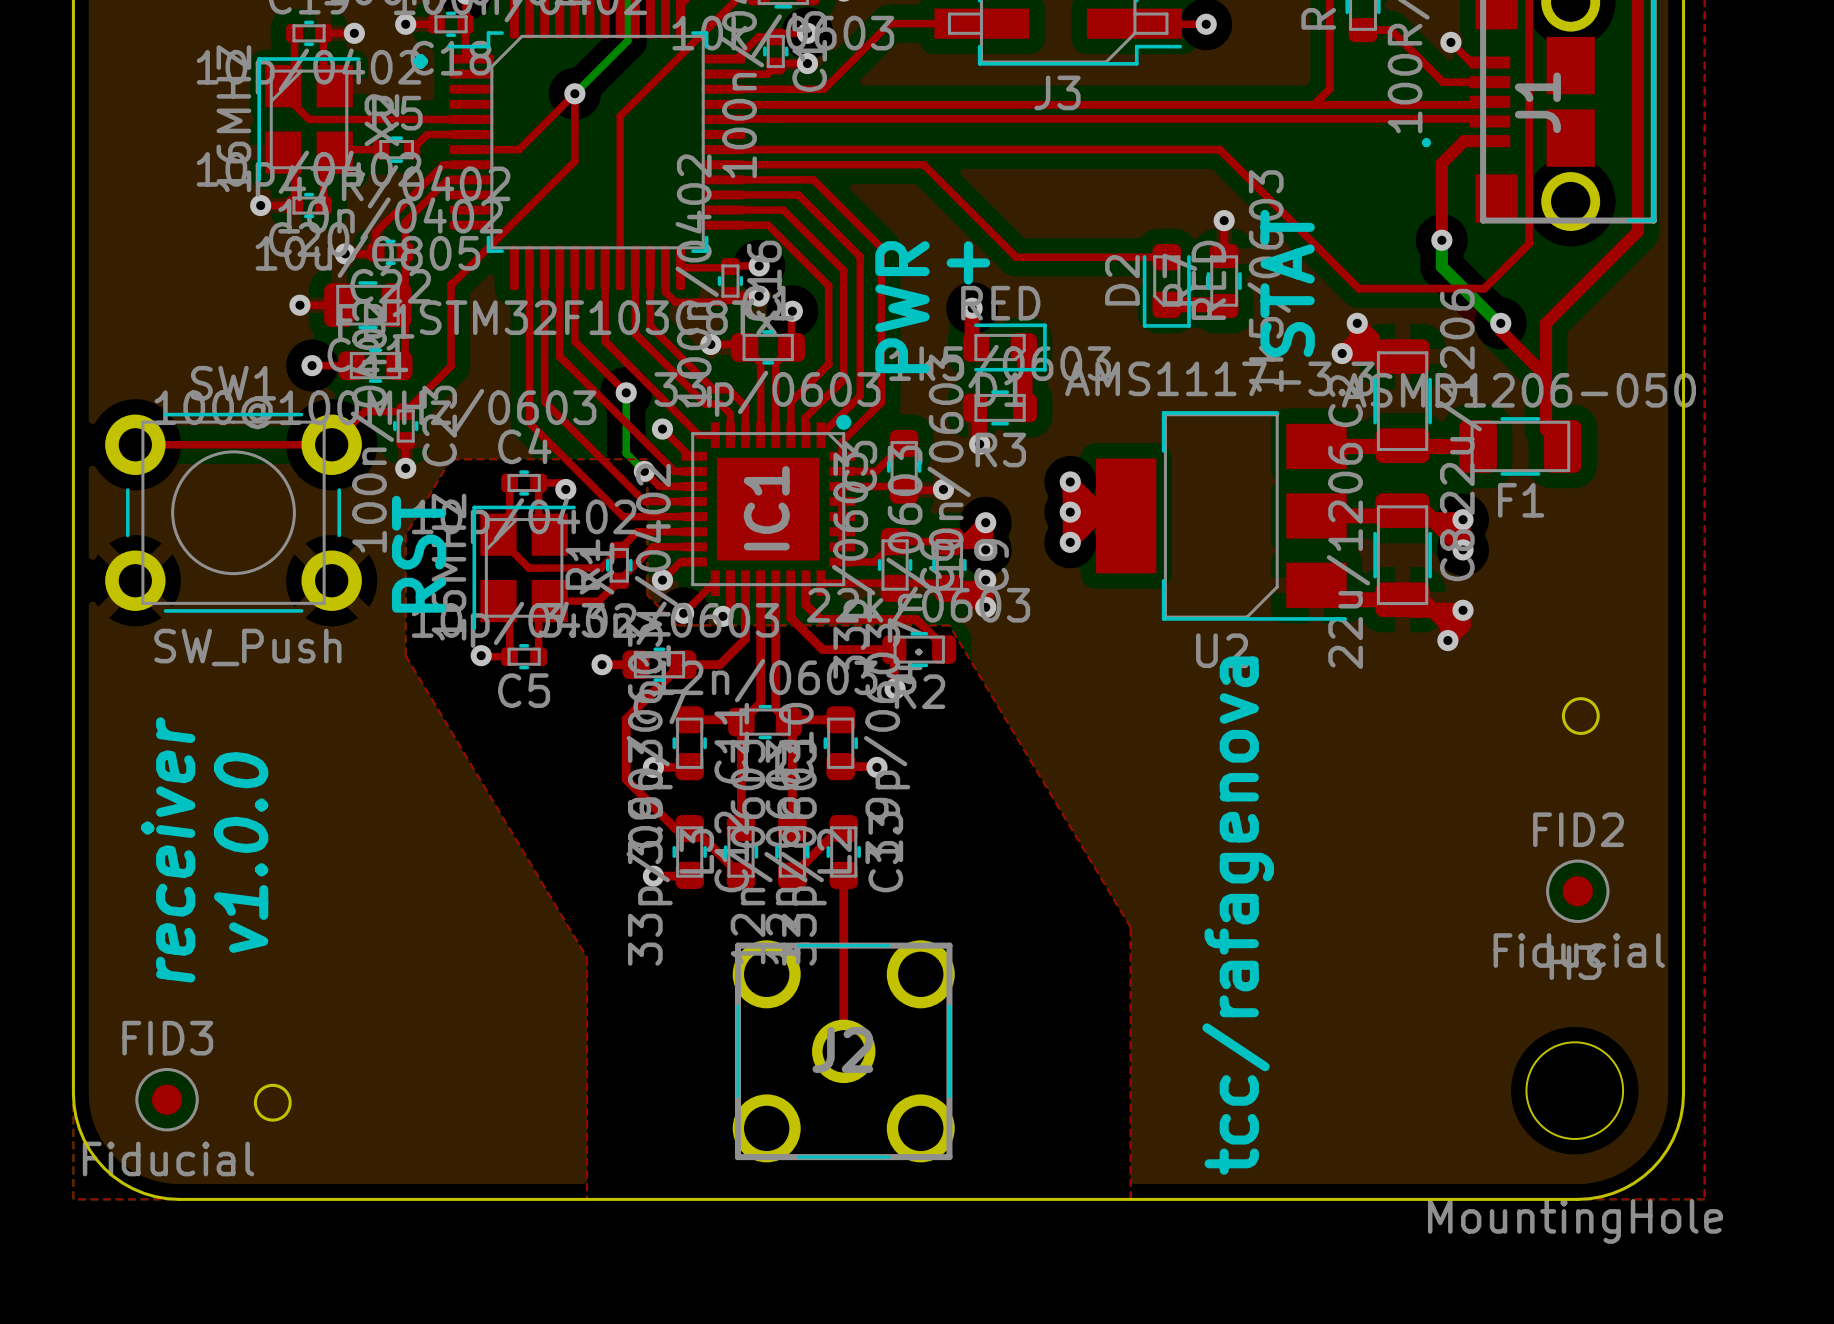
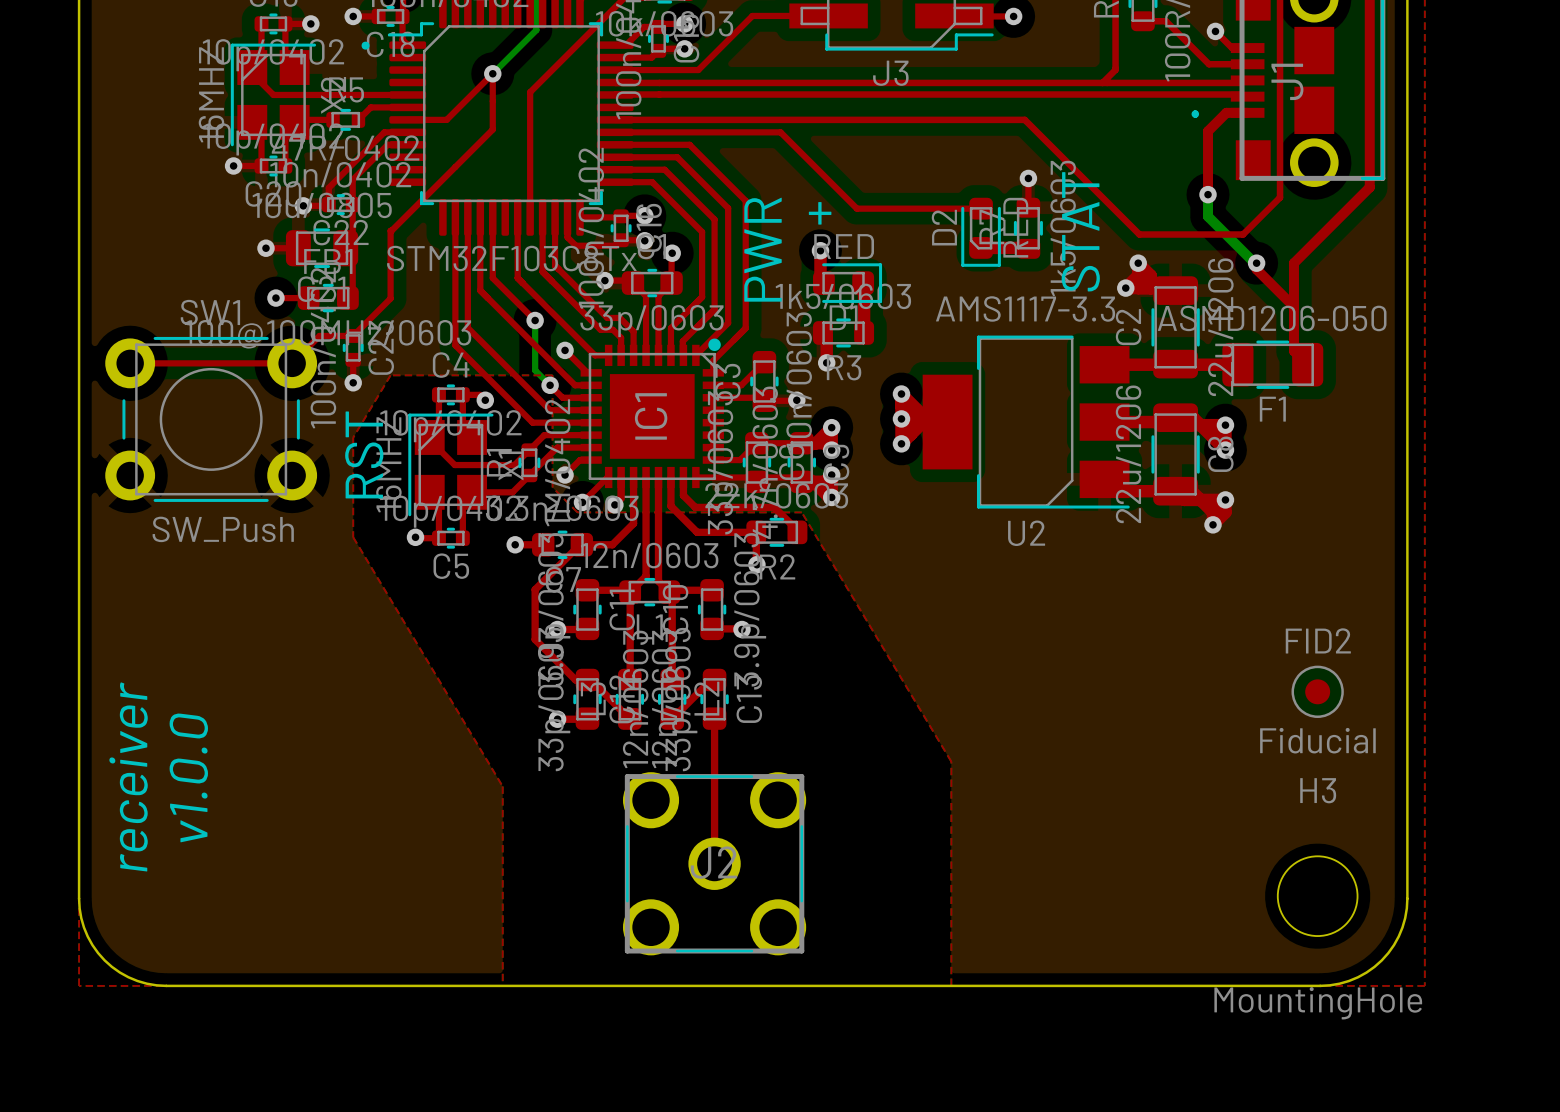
round board edge: [1561, 697, 1600, 735] -> none
text position: receiver (168, 849) -> receiver (128, 776)
text position: v1.0.0 (241, 852) -> v1.0.0 (188, 777)
FID2 position: (1577, 891) -> (1317, 691)
text: tcc/rafagenova (1238, 915) -> none
round board edge: [253, 1083, 292, 1122] -> none
FID3: Fiducial (167, 1099) -> none

